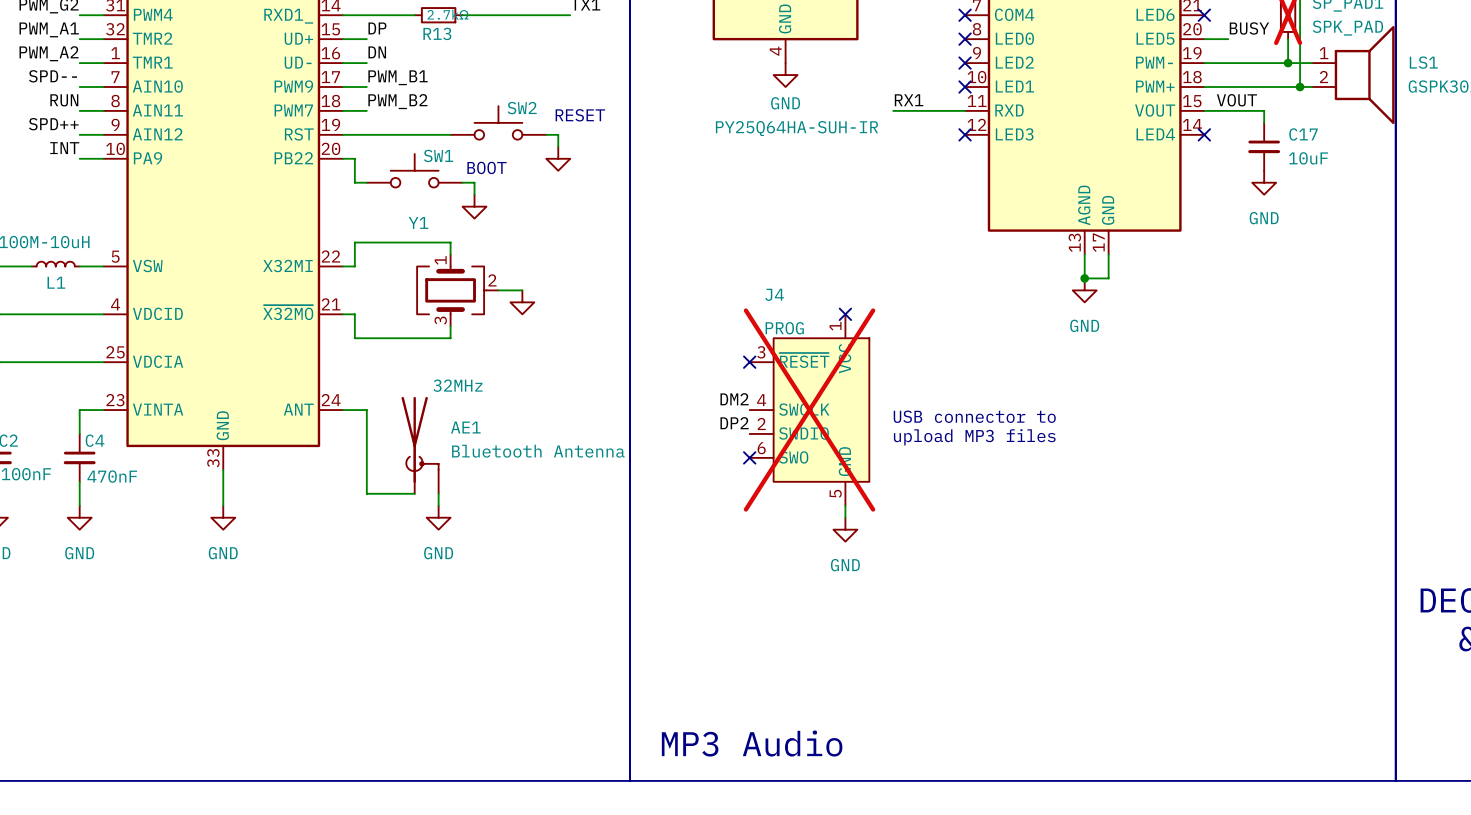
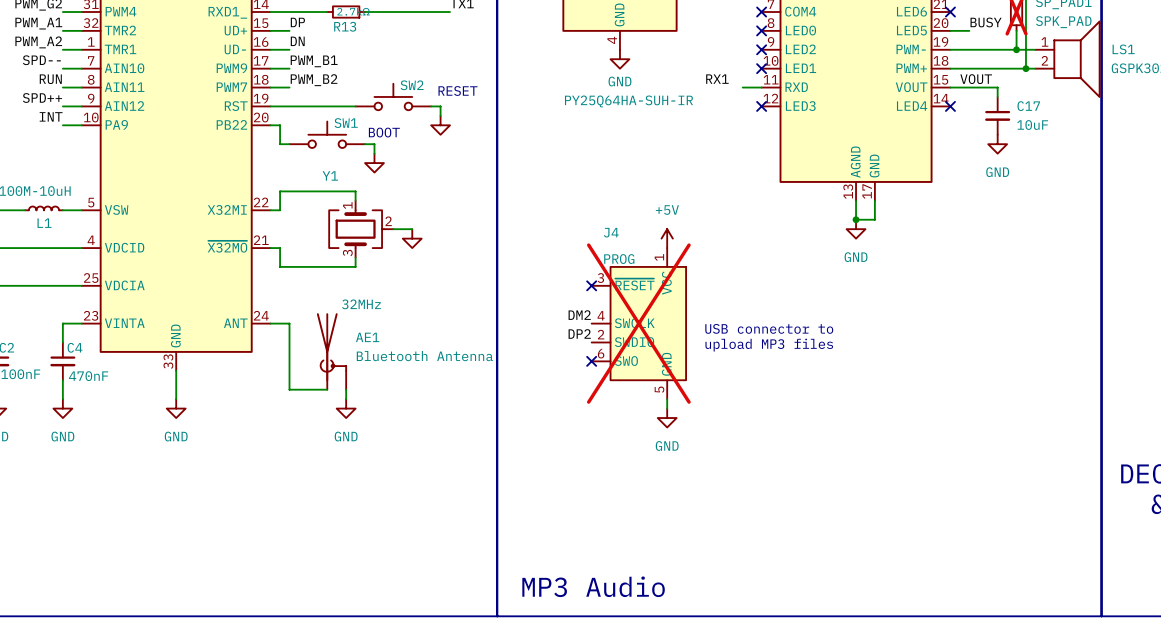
wire: (893, 110) (941, 110) -> none
power symbol: none -> +5V (667, 238)
no-connect mark: (845, 314) -> none

